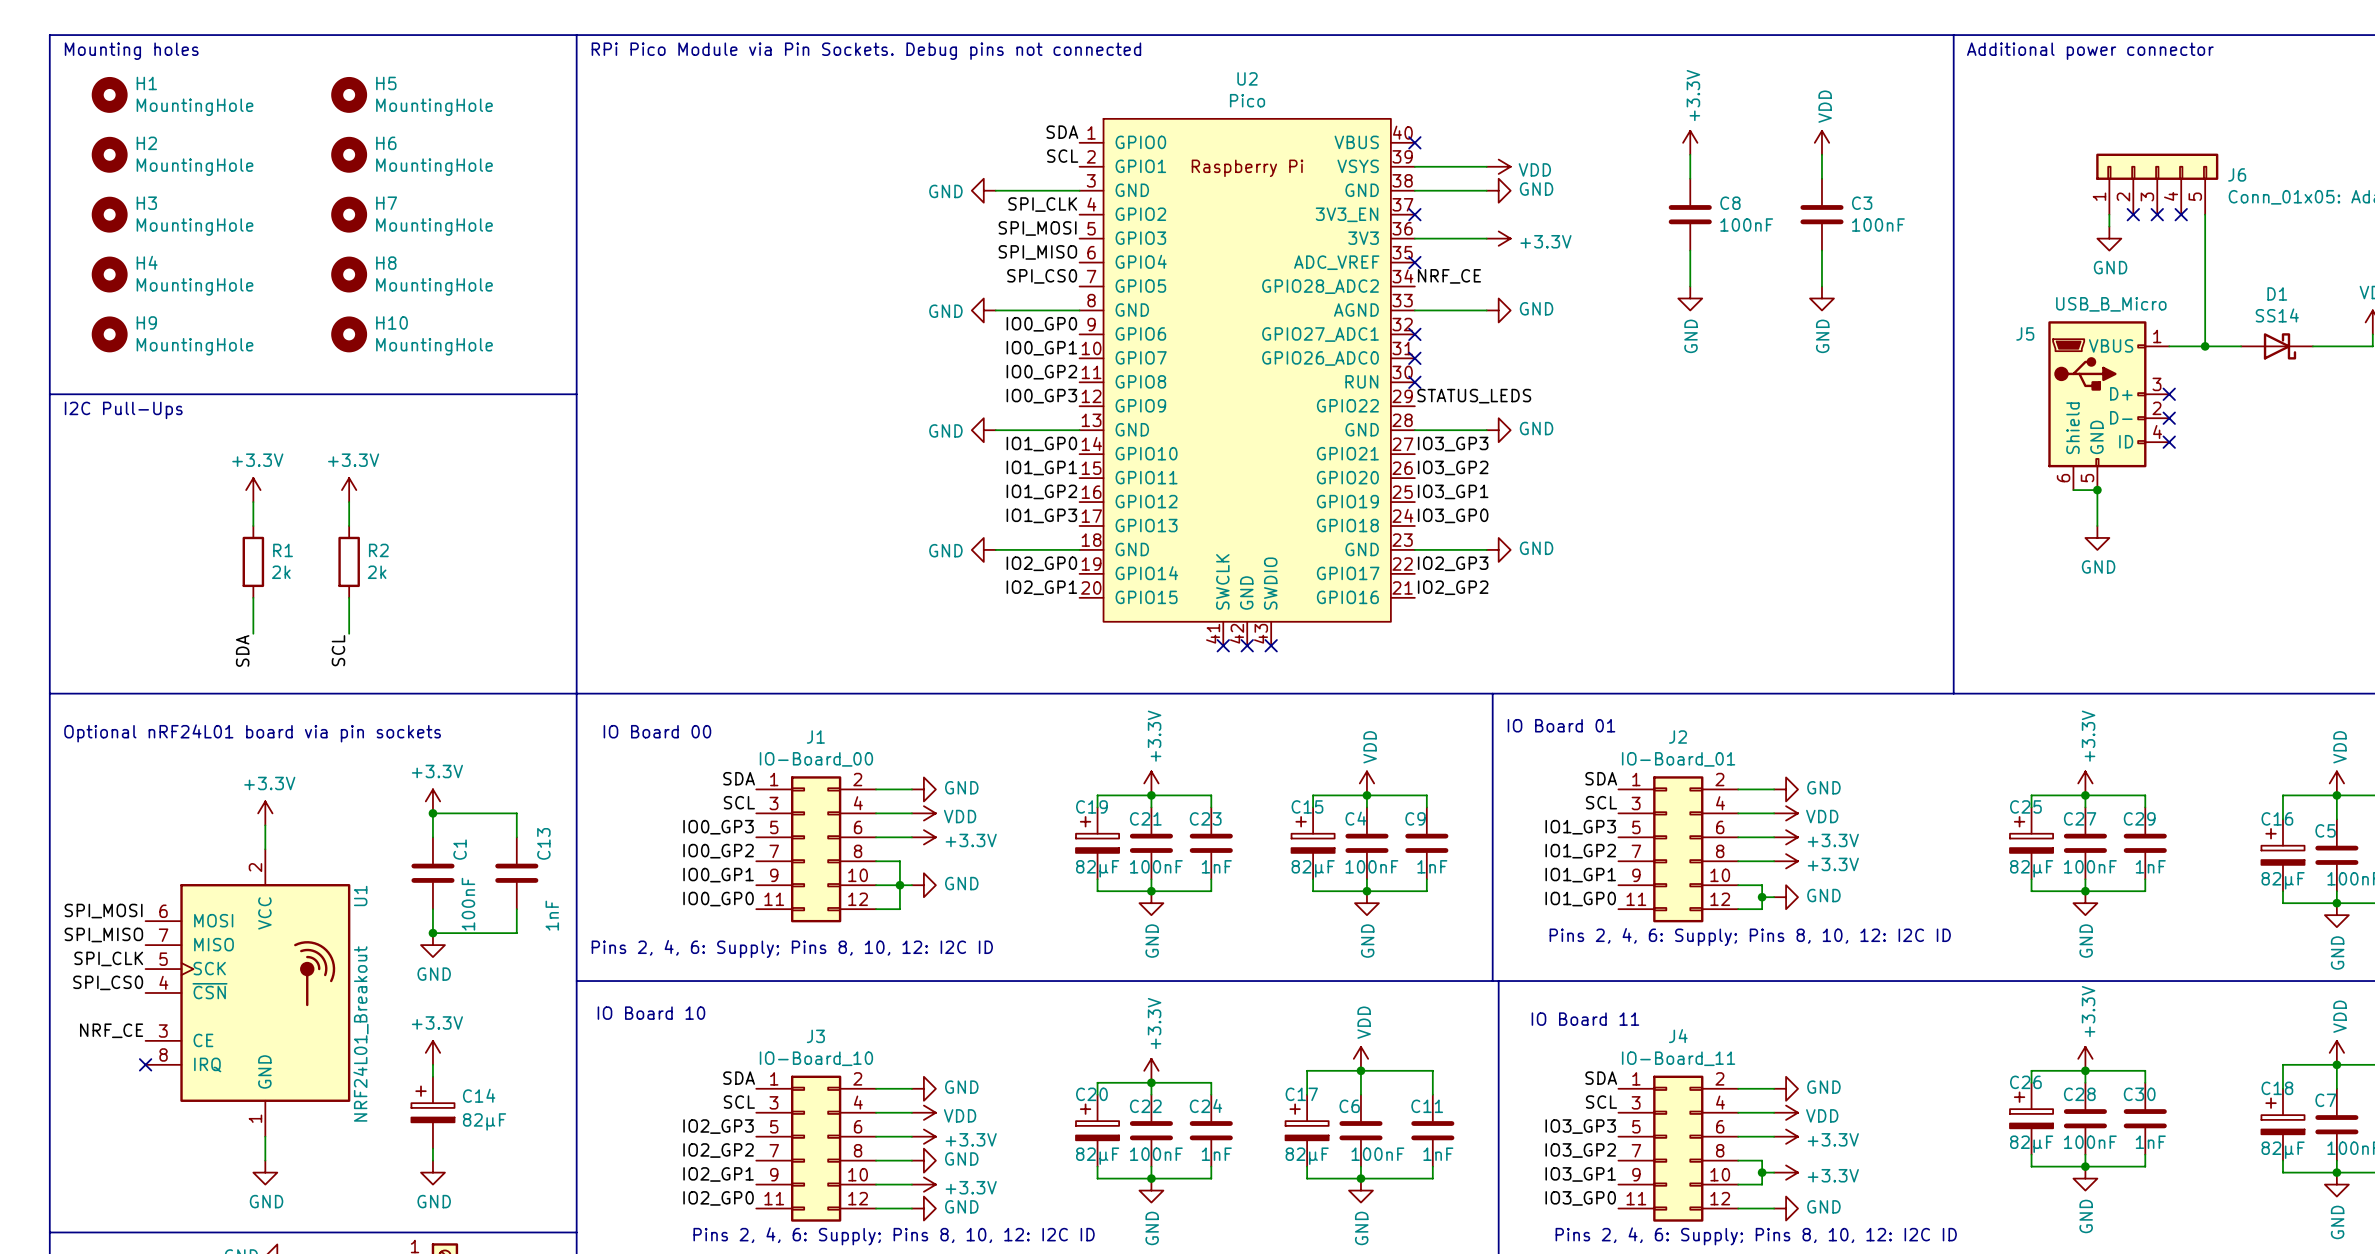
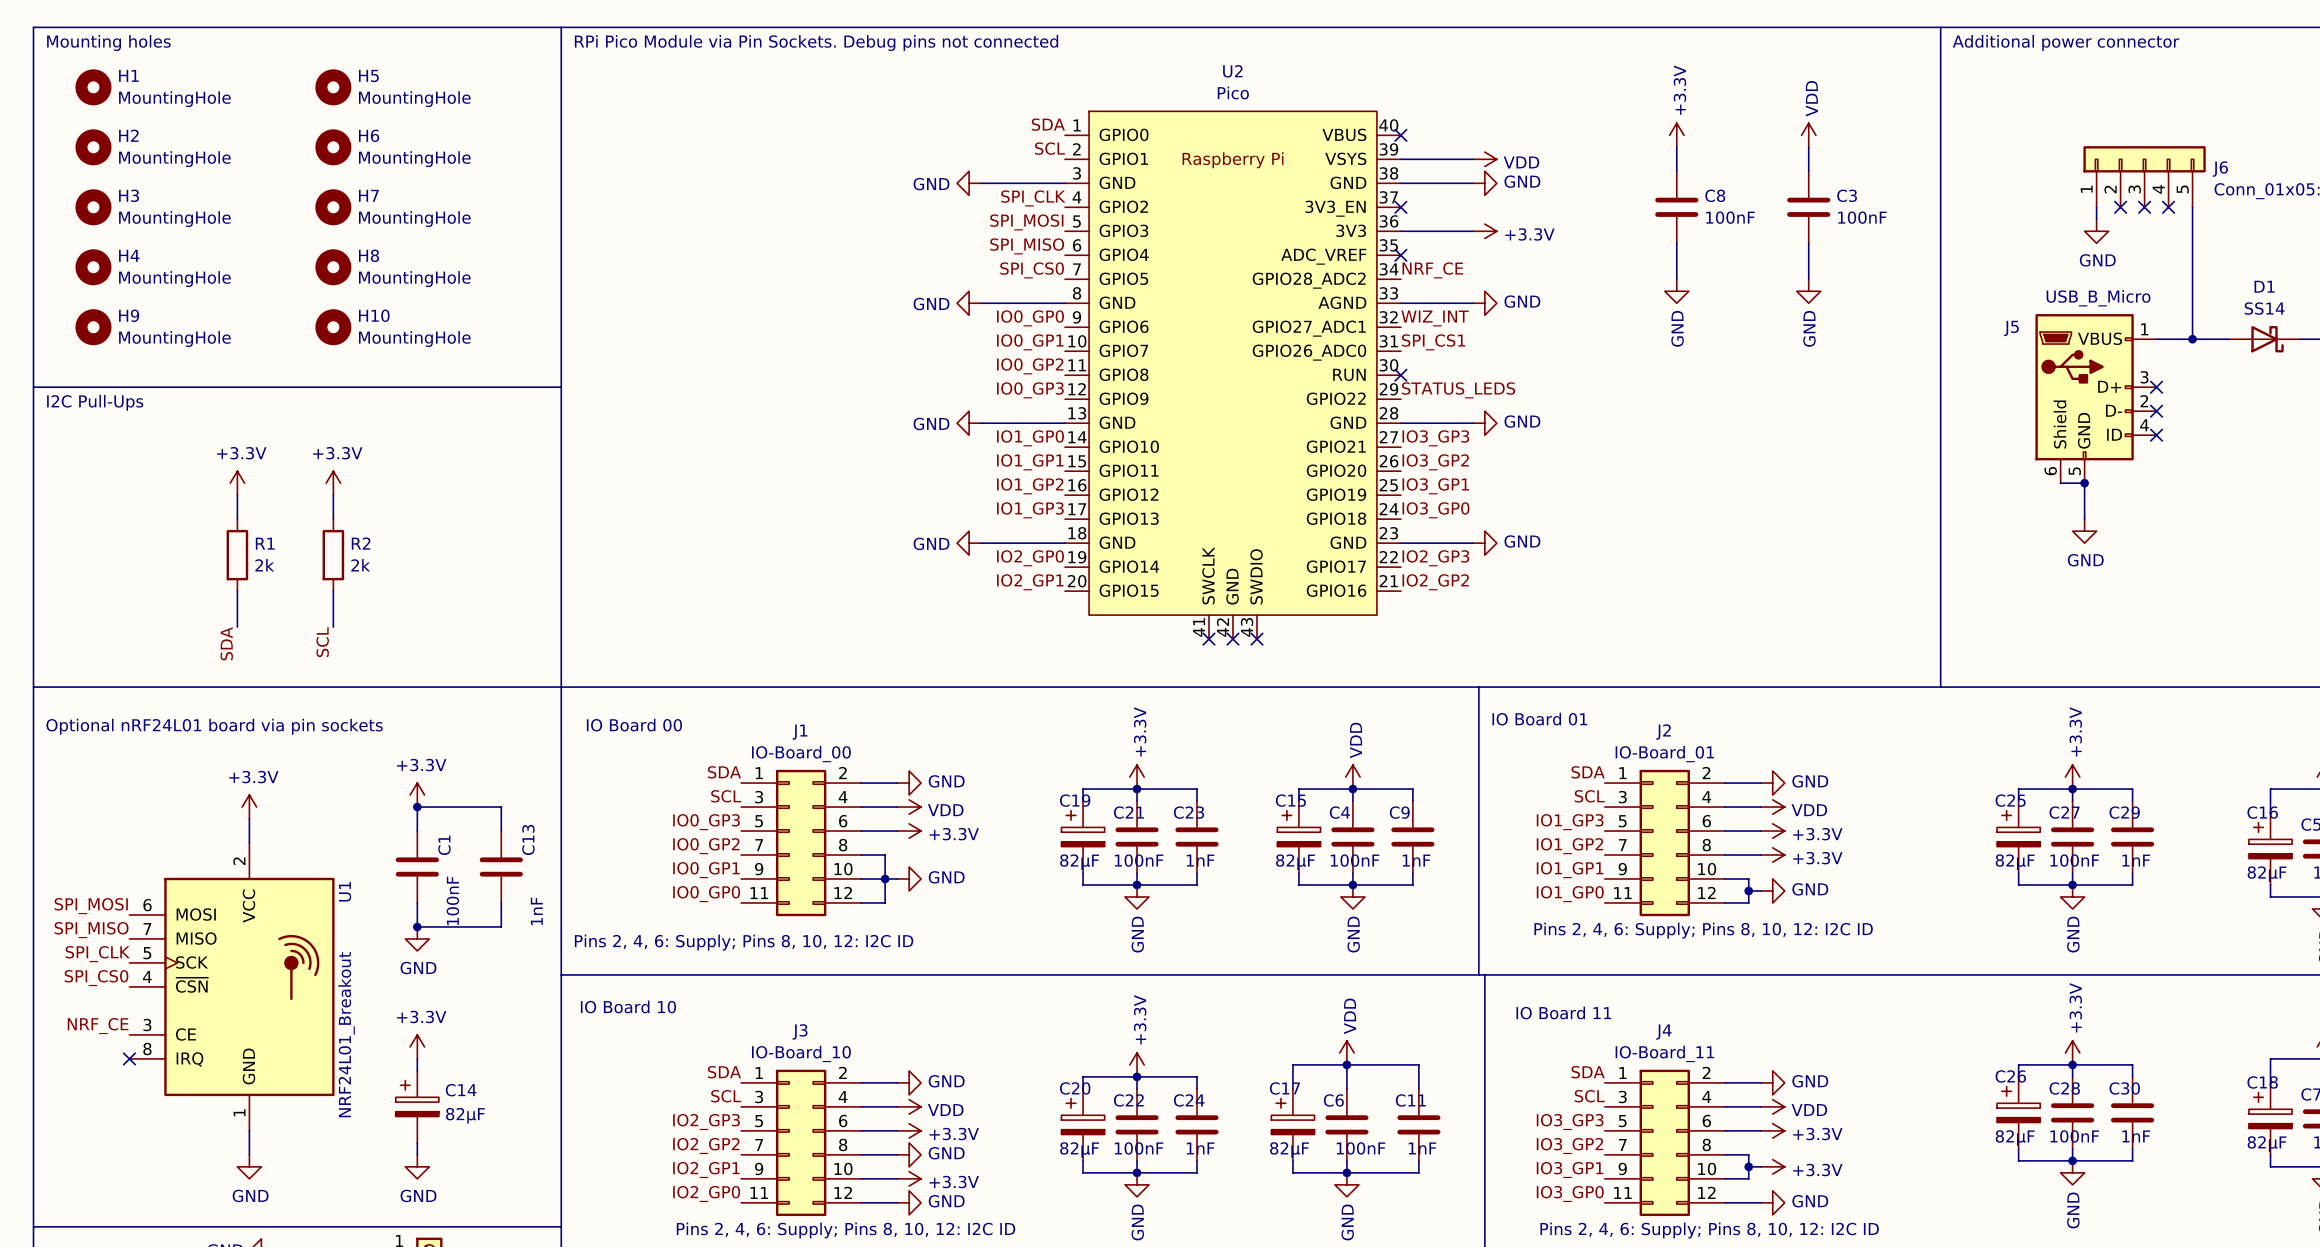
label: none -> WIZ_INT (1435, 318)
no-connect mark: (1414, 334) -> none
label: none -> SPI_CS1 (1433, 342)
no-connect mark: (1414, 358) -> none

